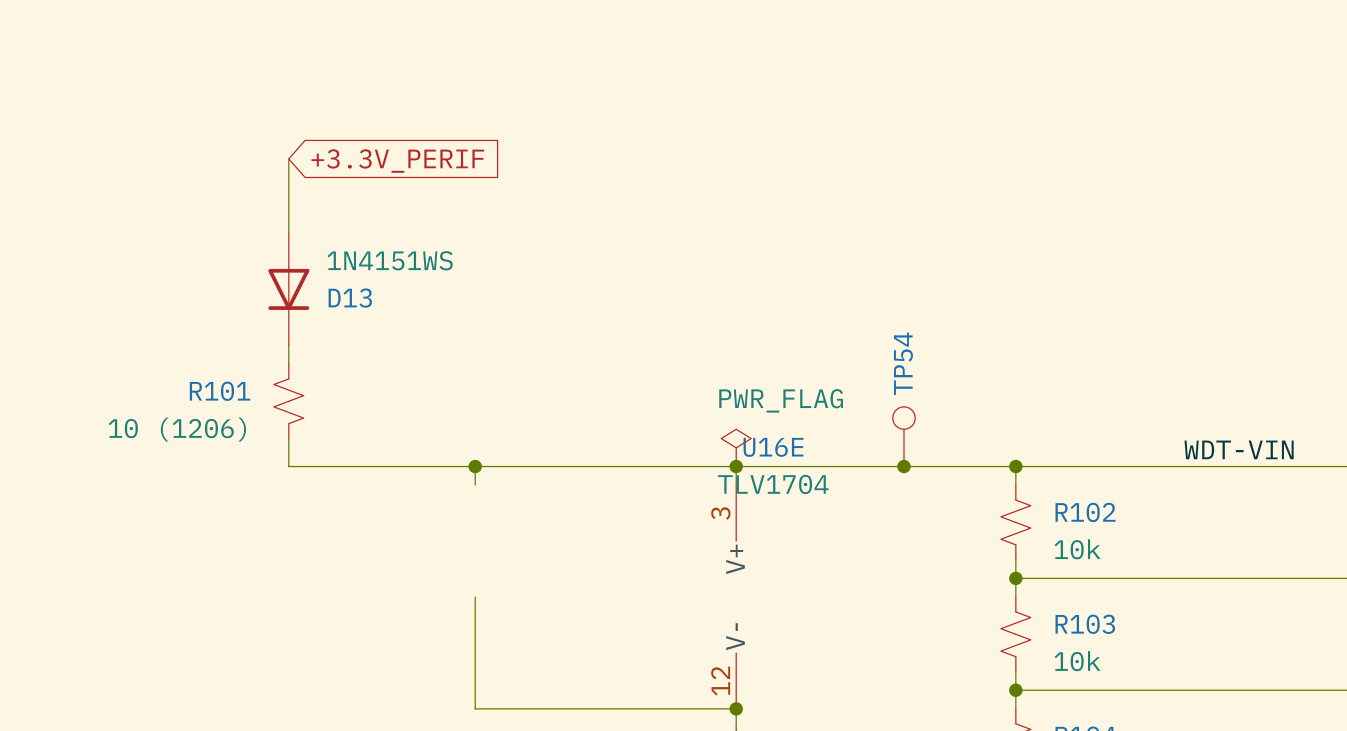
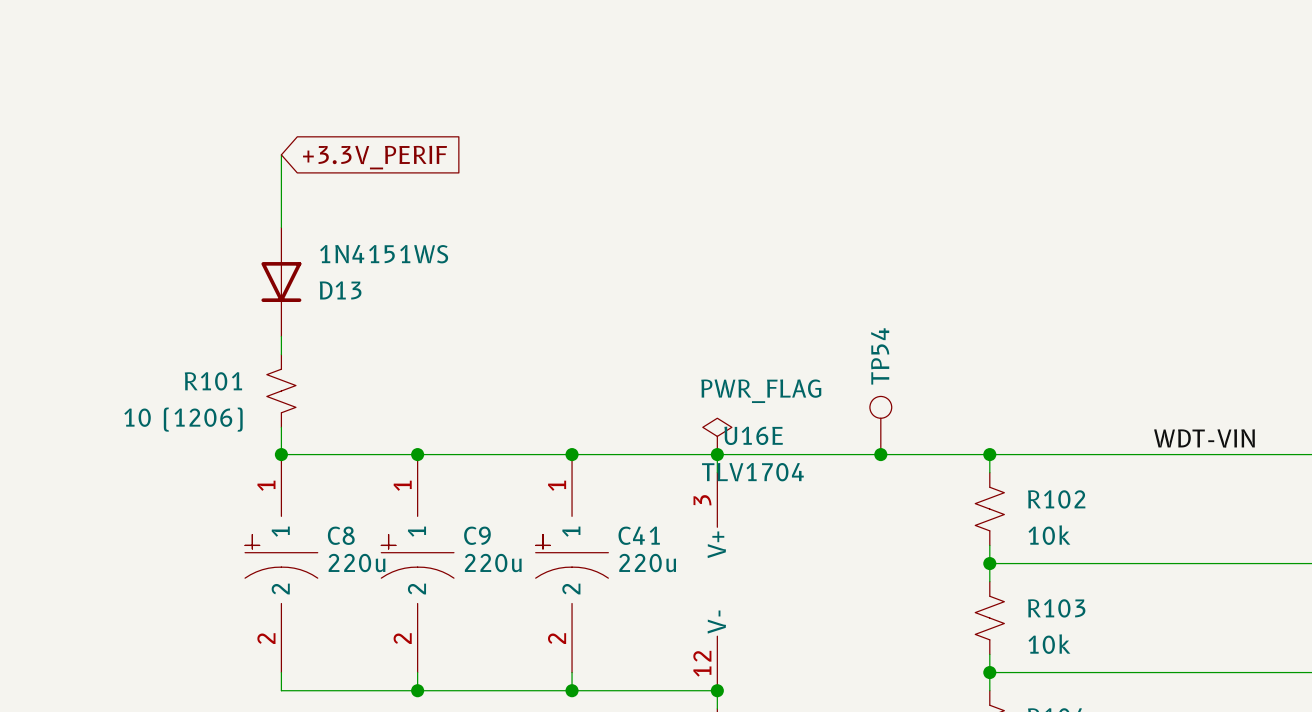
junction: none -> (281, 454)
wire: (475, 466) (475, 485) -> (417, 672) (417, 690)
junction position: (475, 466) -> (417, 454)
junction: none -> (572, 454)
C8: none -> 220u (281, 563)
C9: none -> 220u (417, 563)
C41: none -> 220u (572, 563)
wire: (475, 597) (475, 708) -> (281, 672) (281, 690) (463, 690)
wire: none -> (572, 672) (572, 690)
junction: none -> (417, 690)
junction: none -> (572, 690)

